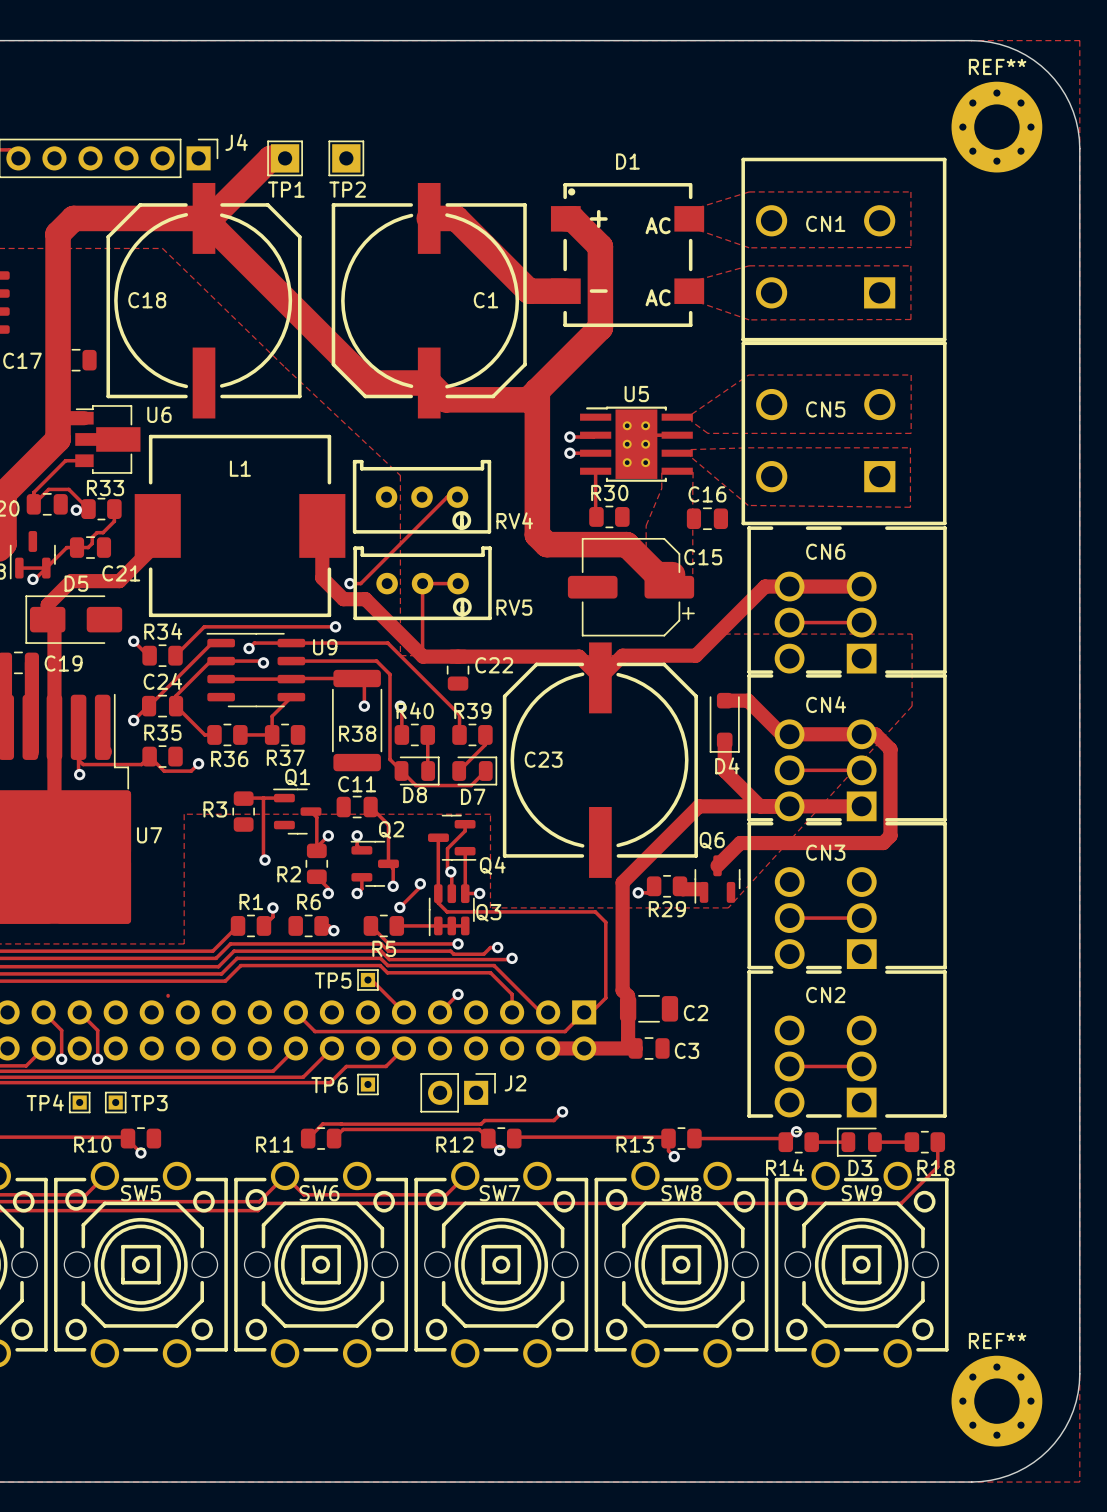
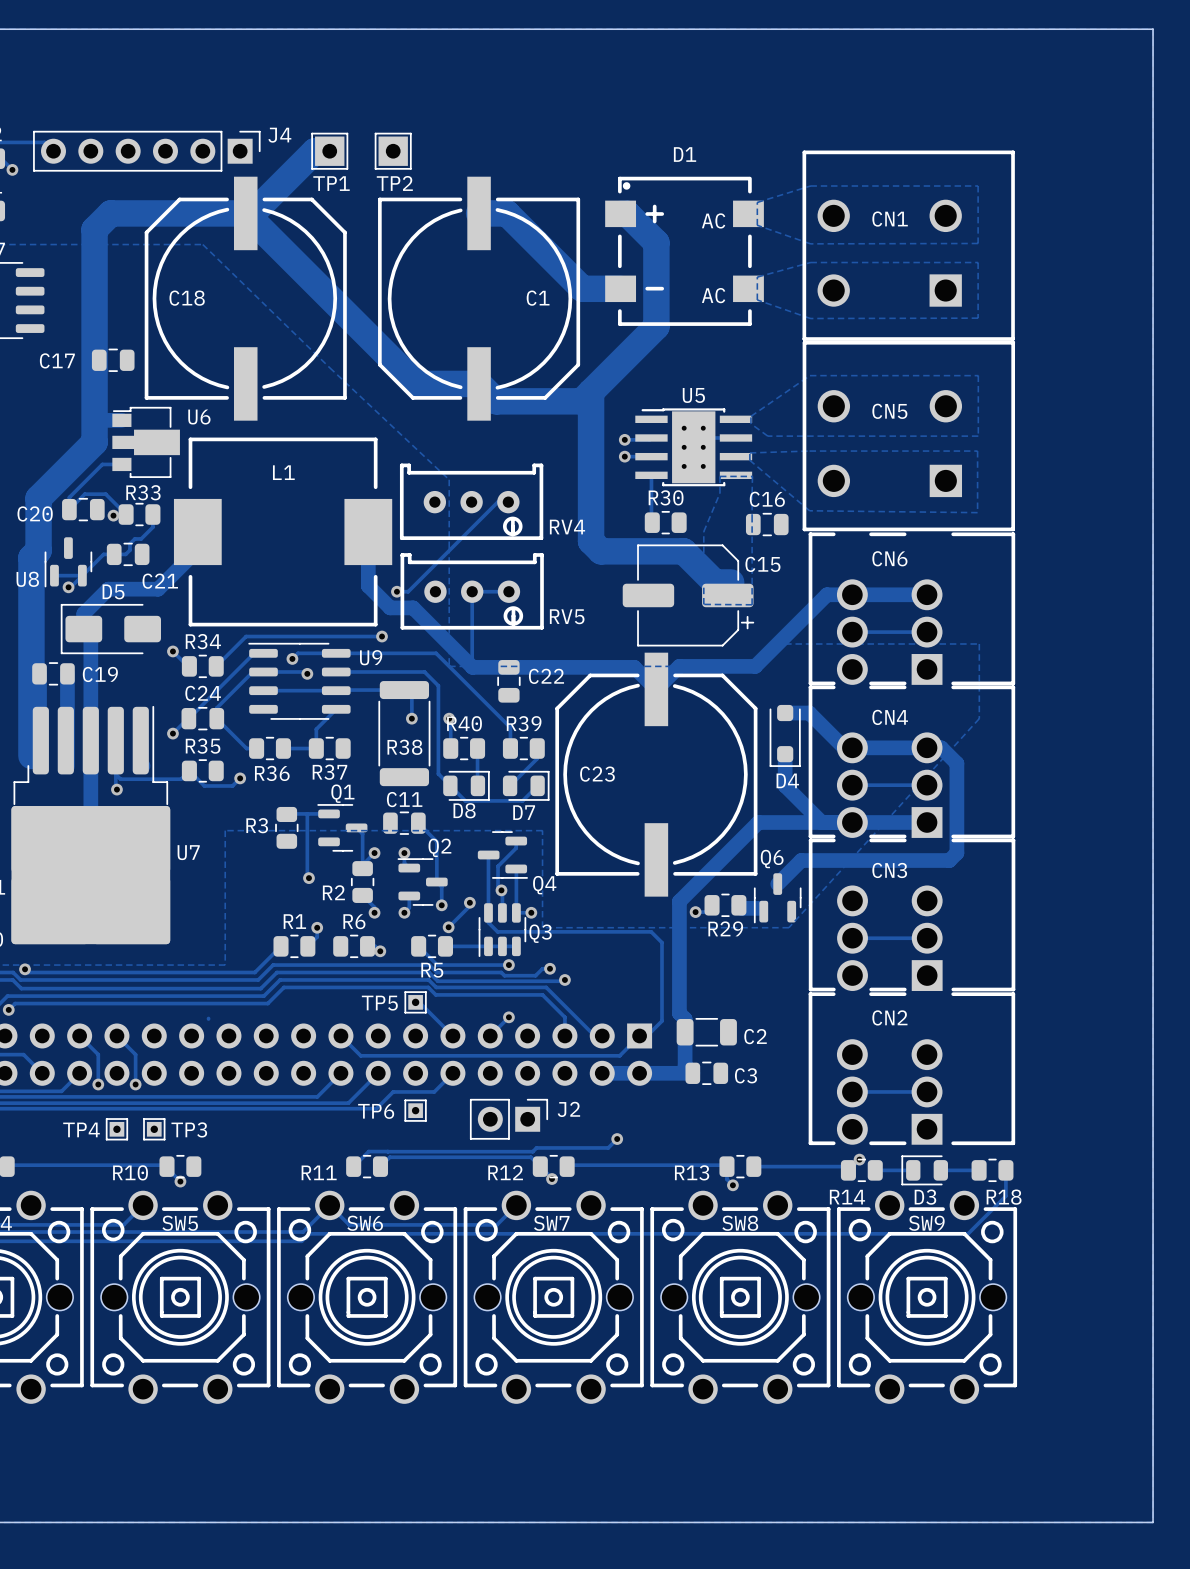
board edge: (971, 40) (999, 44) (1017, 50) (1033, 60) (1048, 72) (1060, 86) (1069, 103) (1076, 120) (1079, 148) -> (1041, 29) (1153, 29) (1153, 141)
REF**: (996, 127) -> none
board edge: (1079, 1373) (1076, 1401) (1069, 1419) (1060, 1435) (1048, 1450) (1033, 1462) (1017, 1471) (999, 1478) (971, 1482) -> (1153, 1410) (1153, 1522) (1041, 1522)
REF**: (996, 1401) -> none

